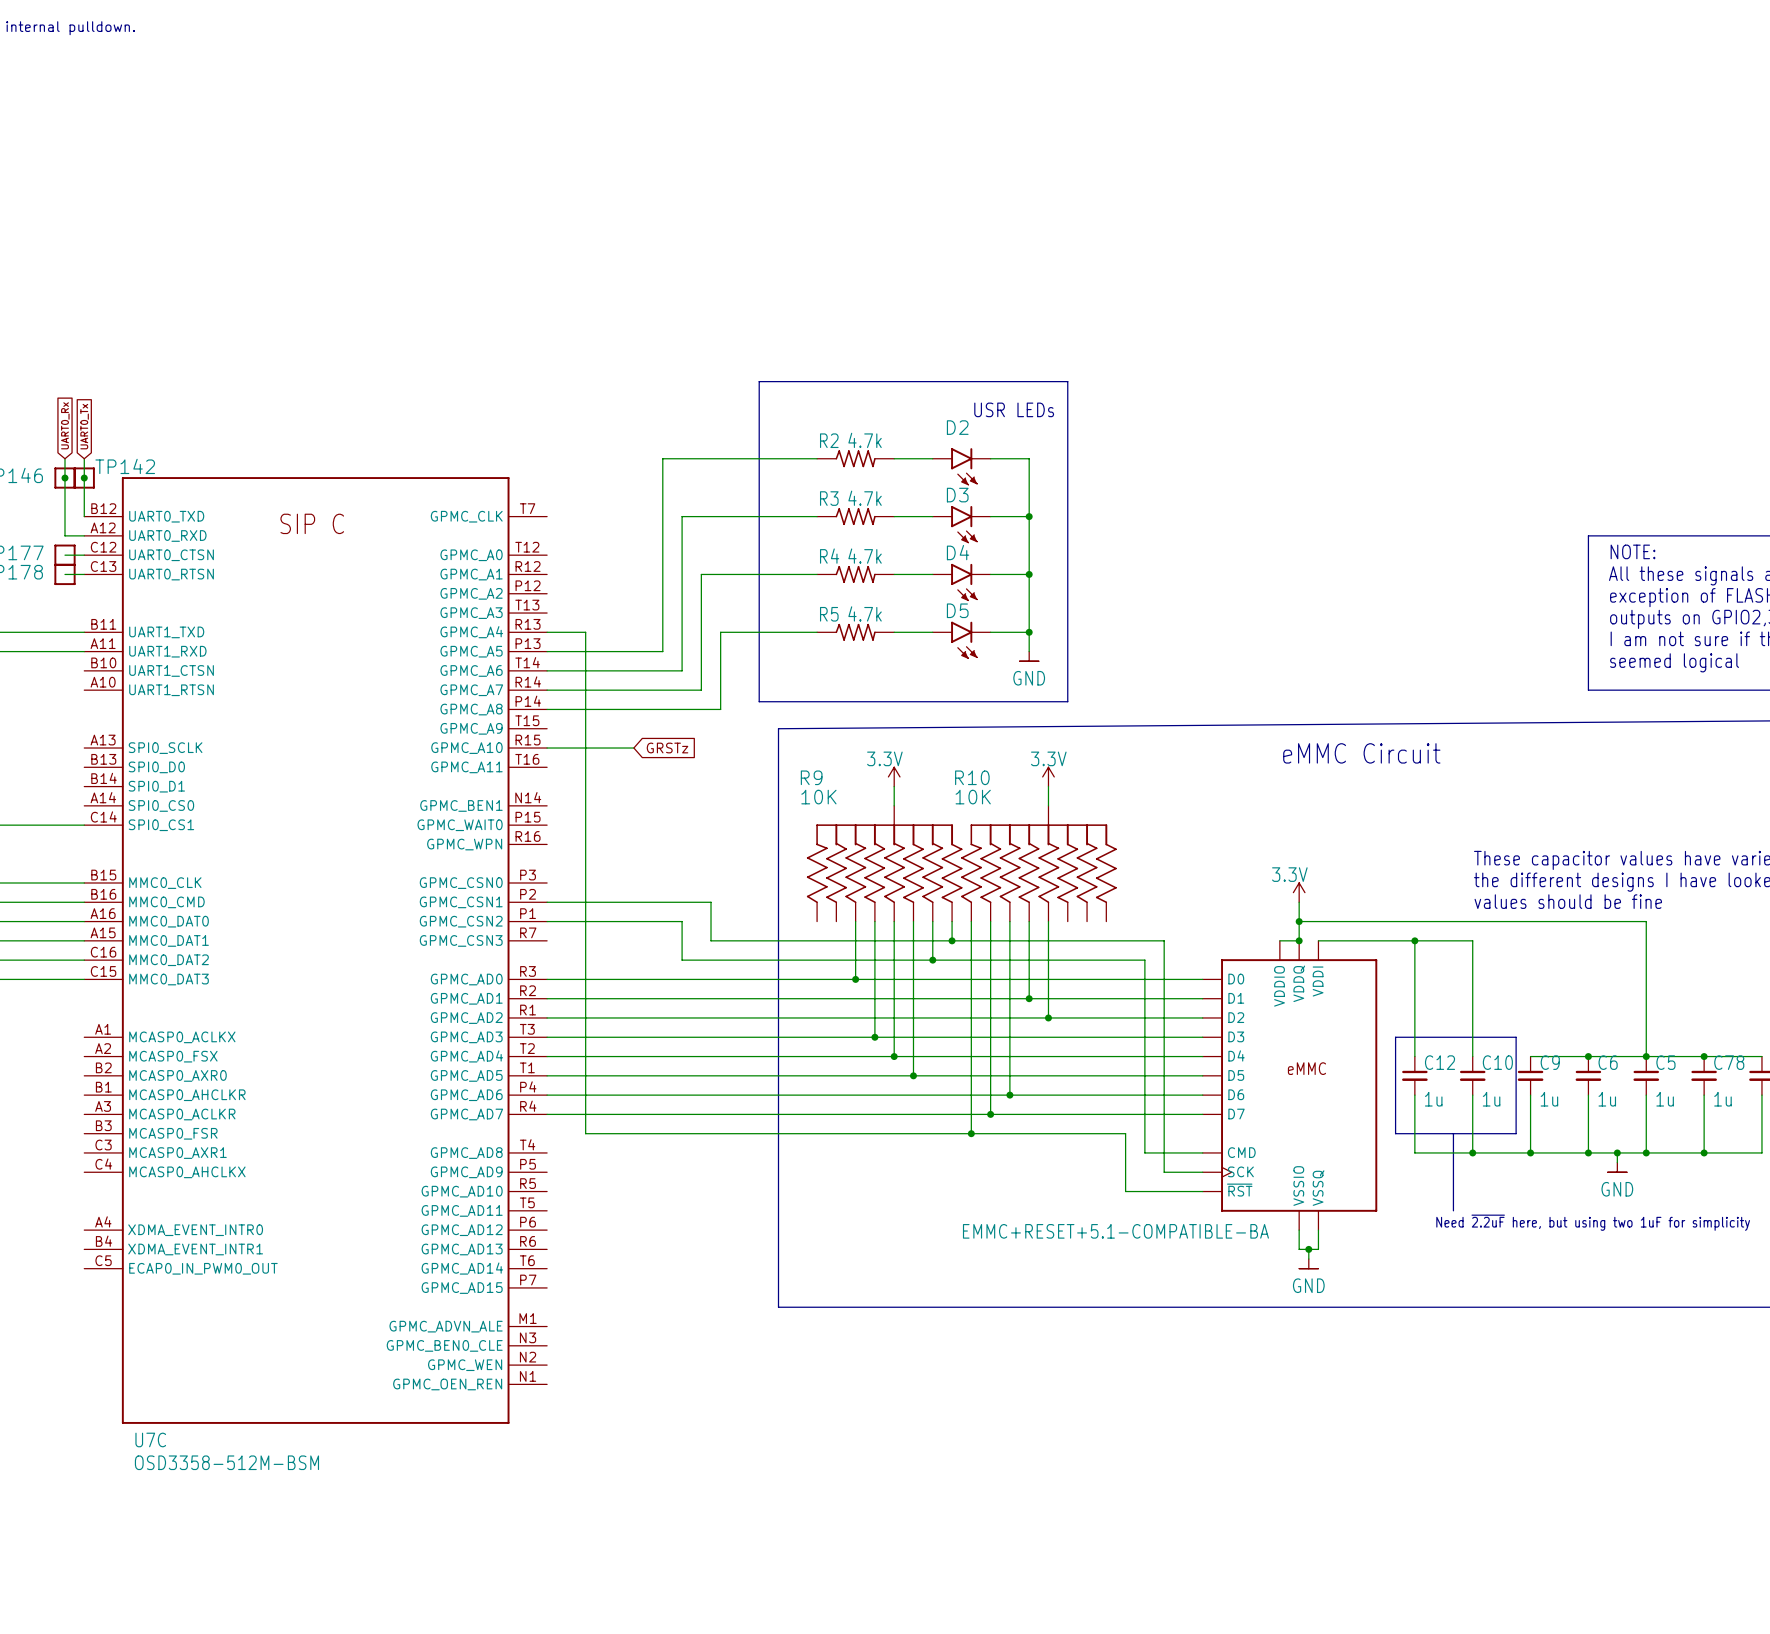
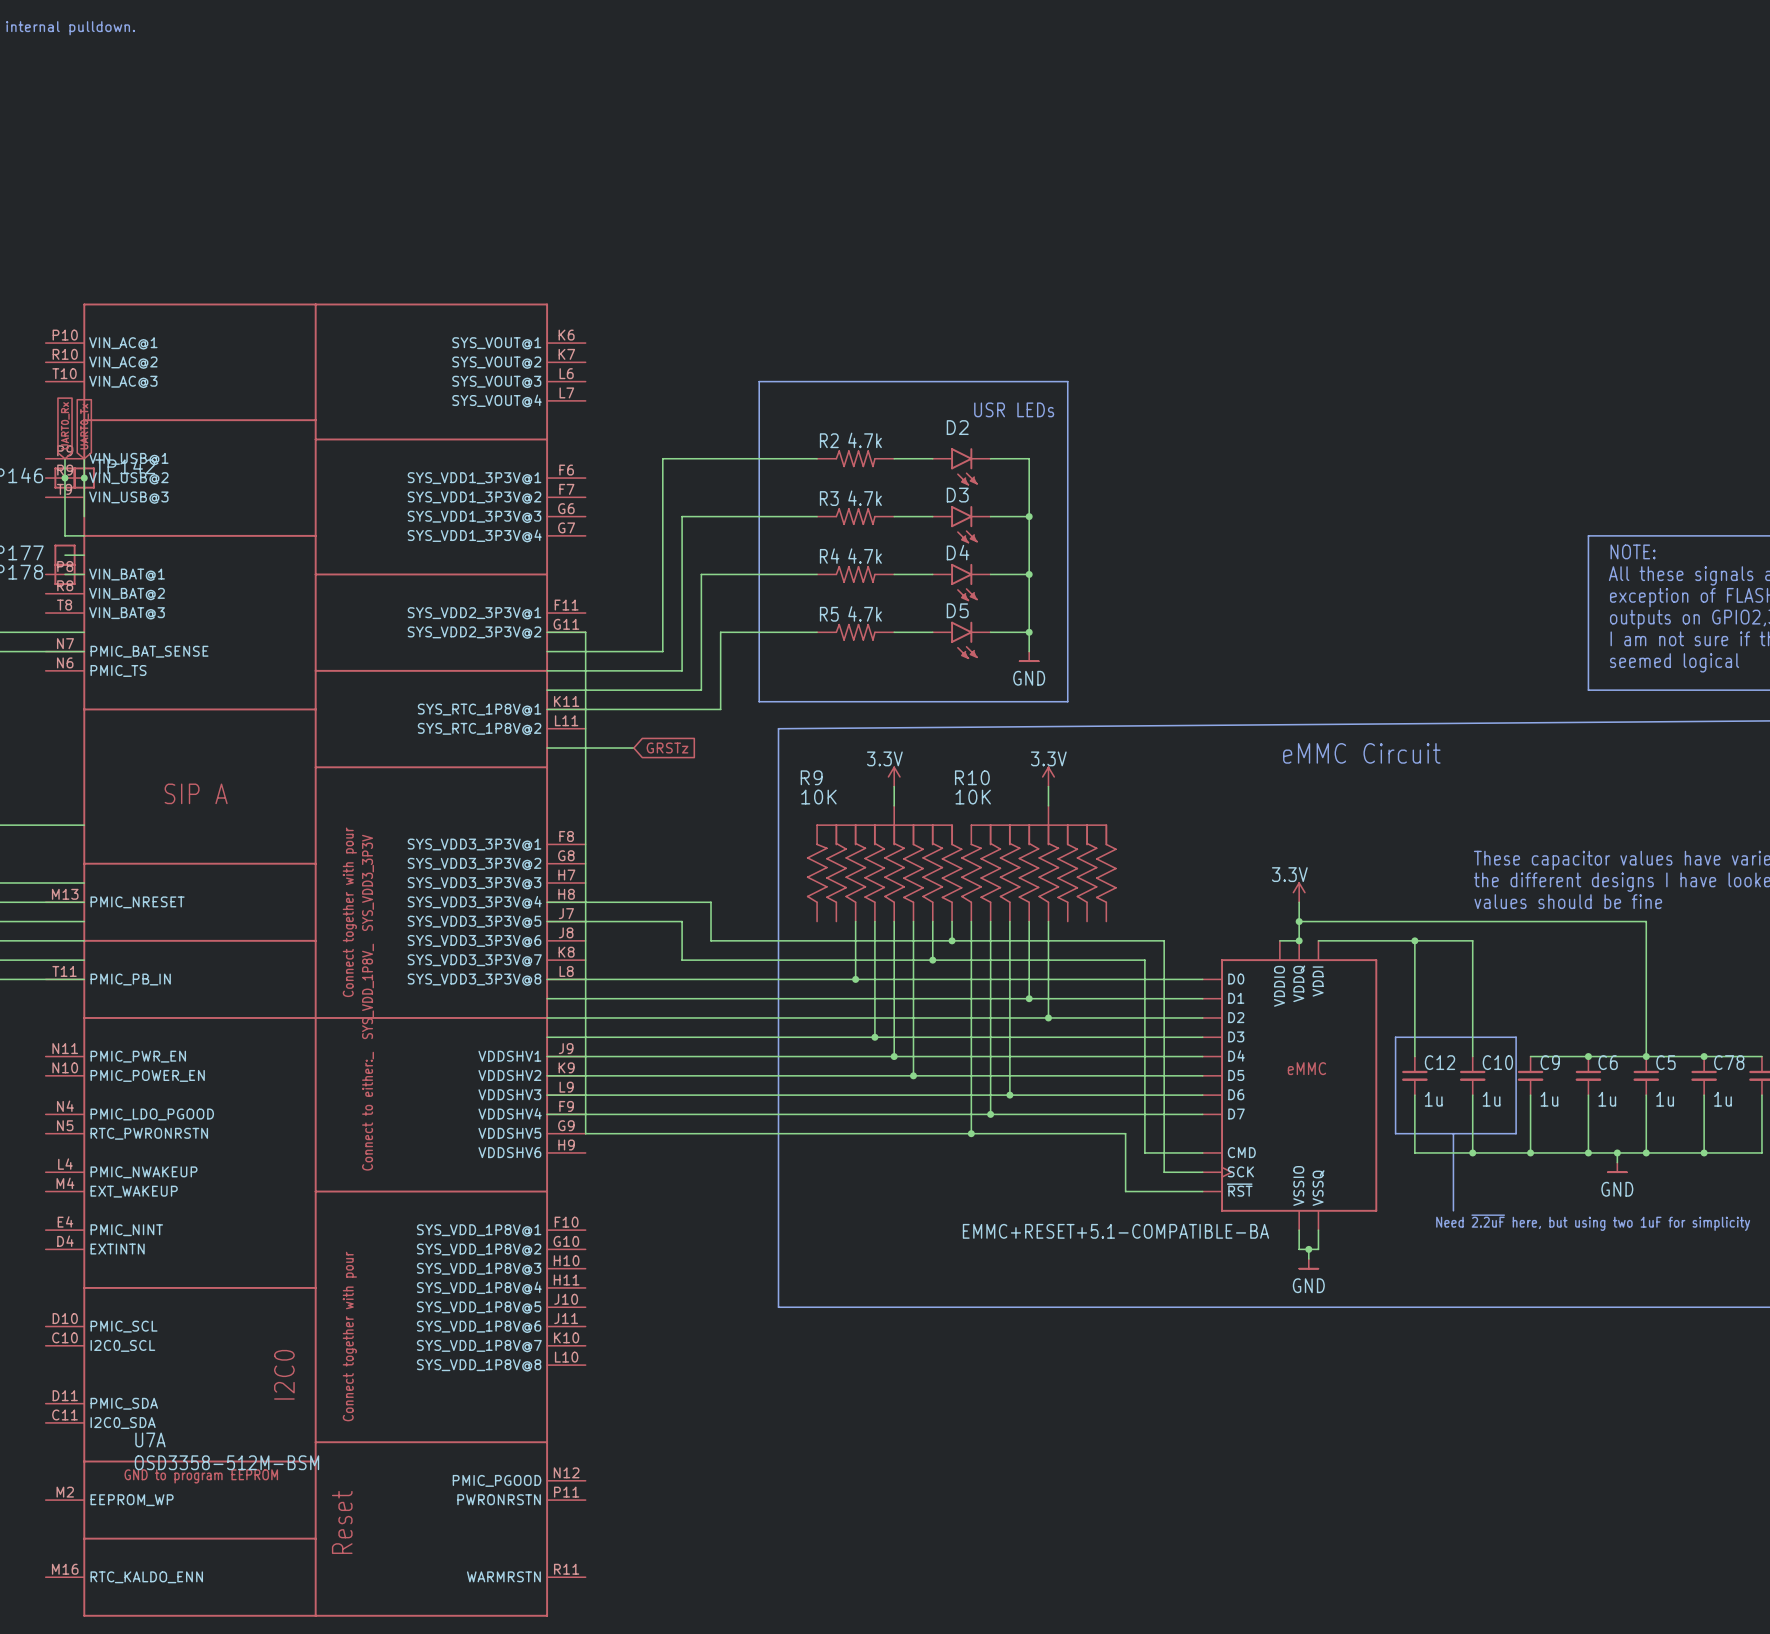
U7C: OSD3358-512M-BSM (315, 950) -> none
U7A: none -> OSD3358-512M-BSM (315, 960)

